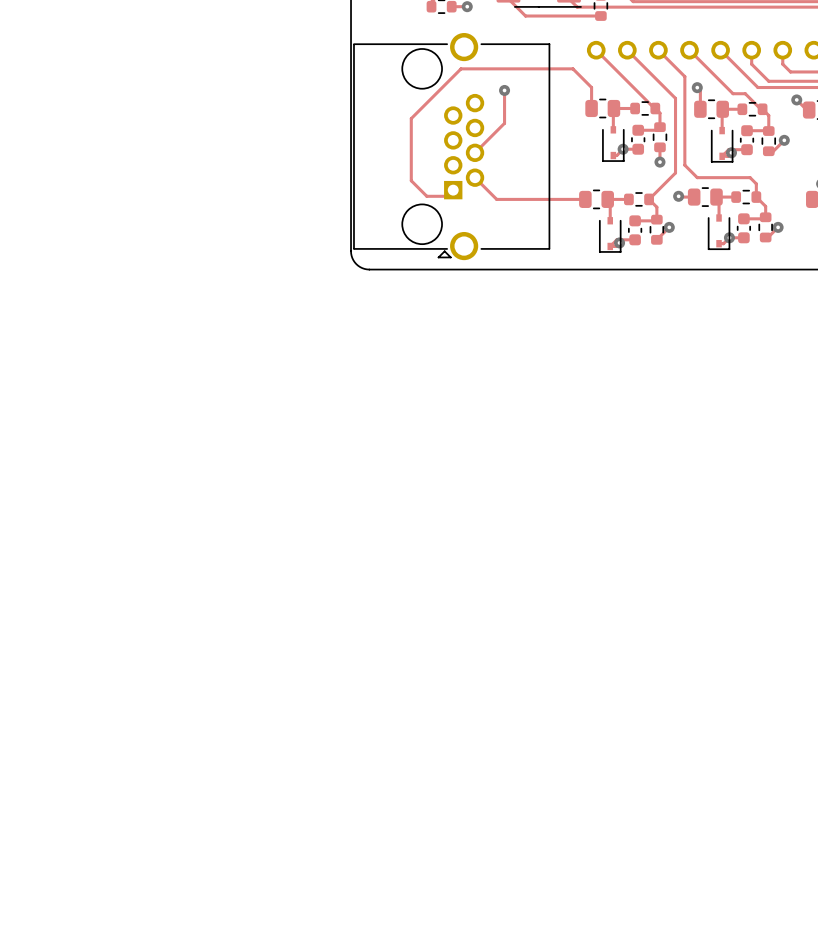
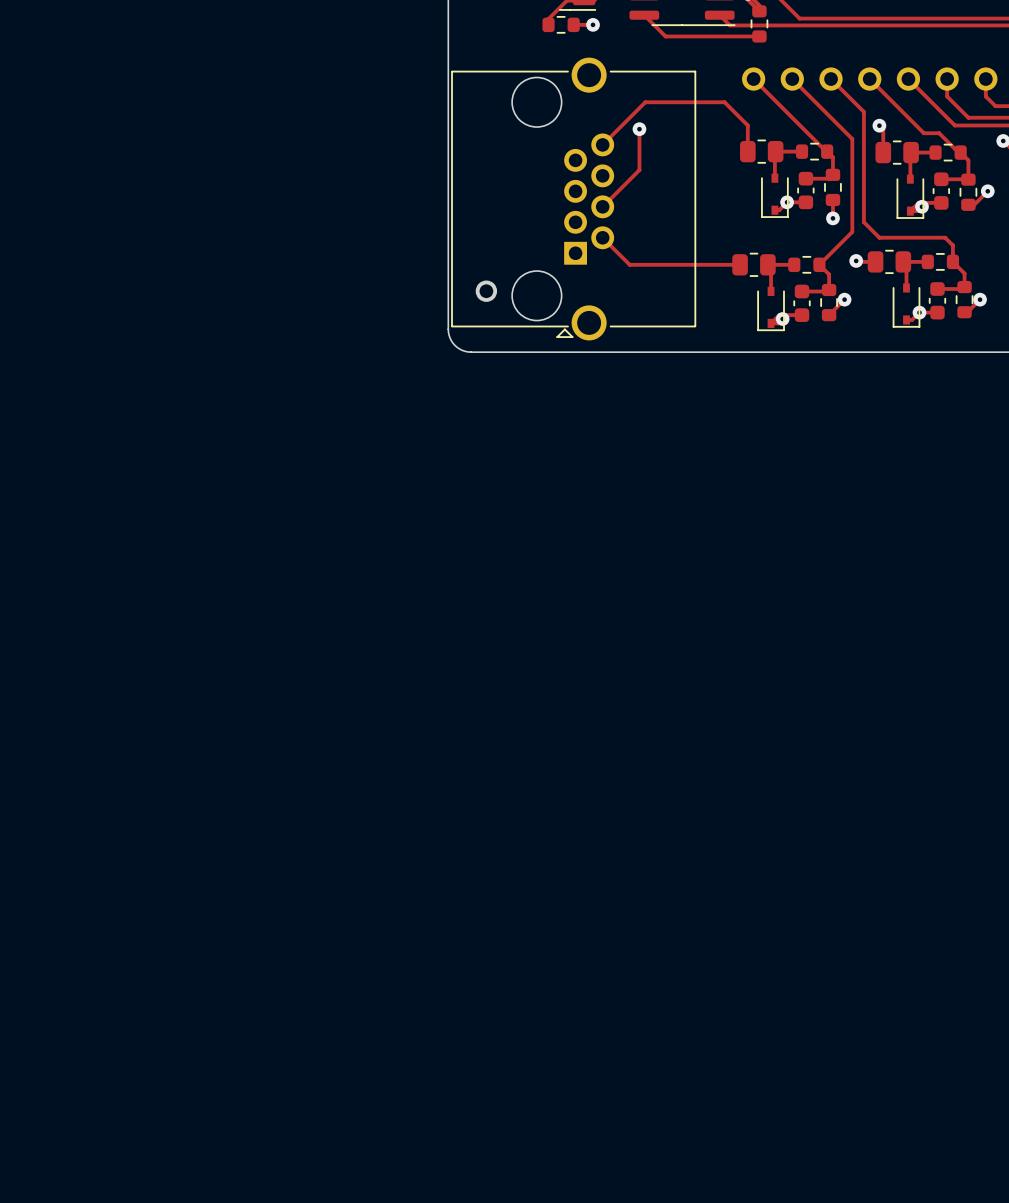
track: (509, 68) (461, 68) (411, 118) (411, 180) (426, 196) (447, 196) (453, 190) -> (645, 102) (602, 144)
round board edge: none -> [475, 280, 498, 302]

